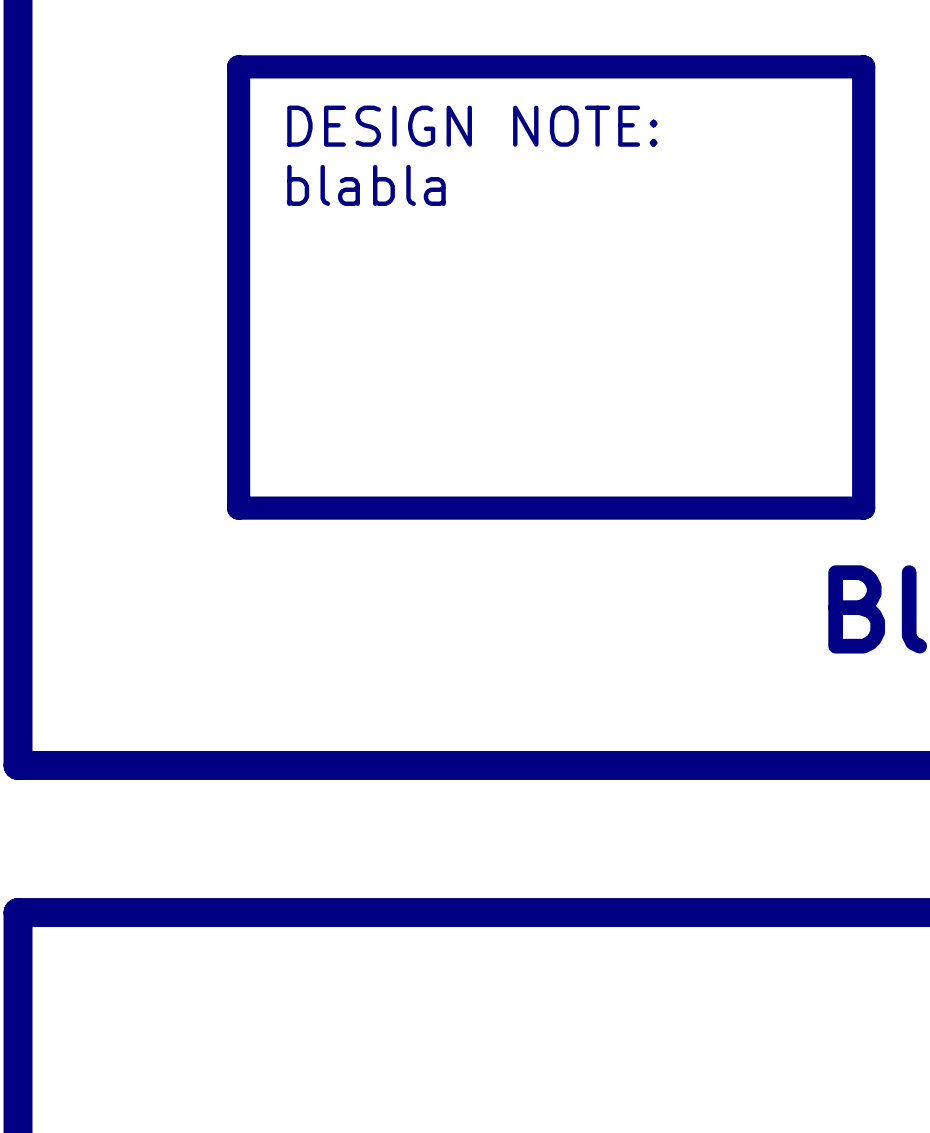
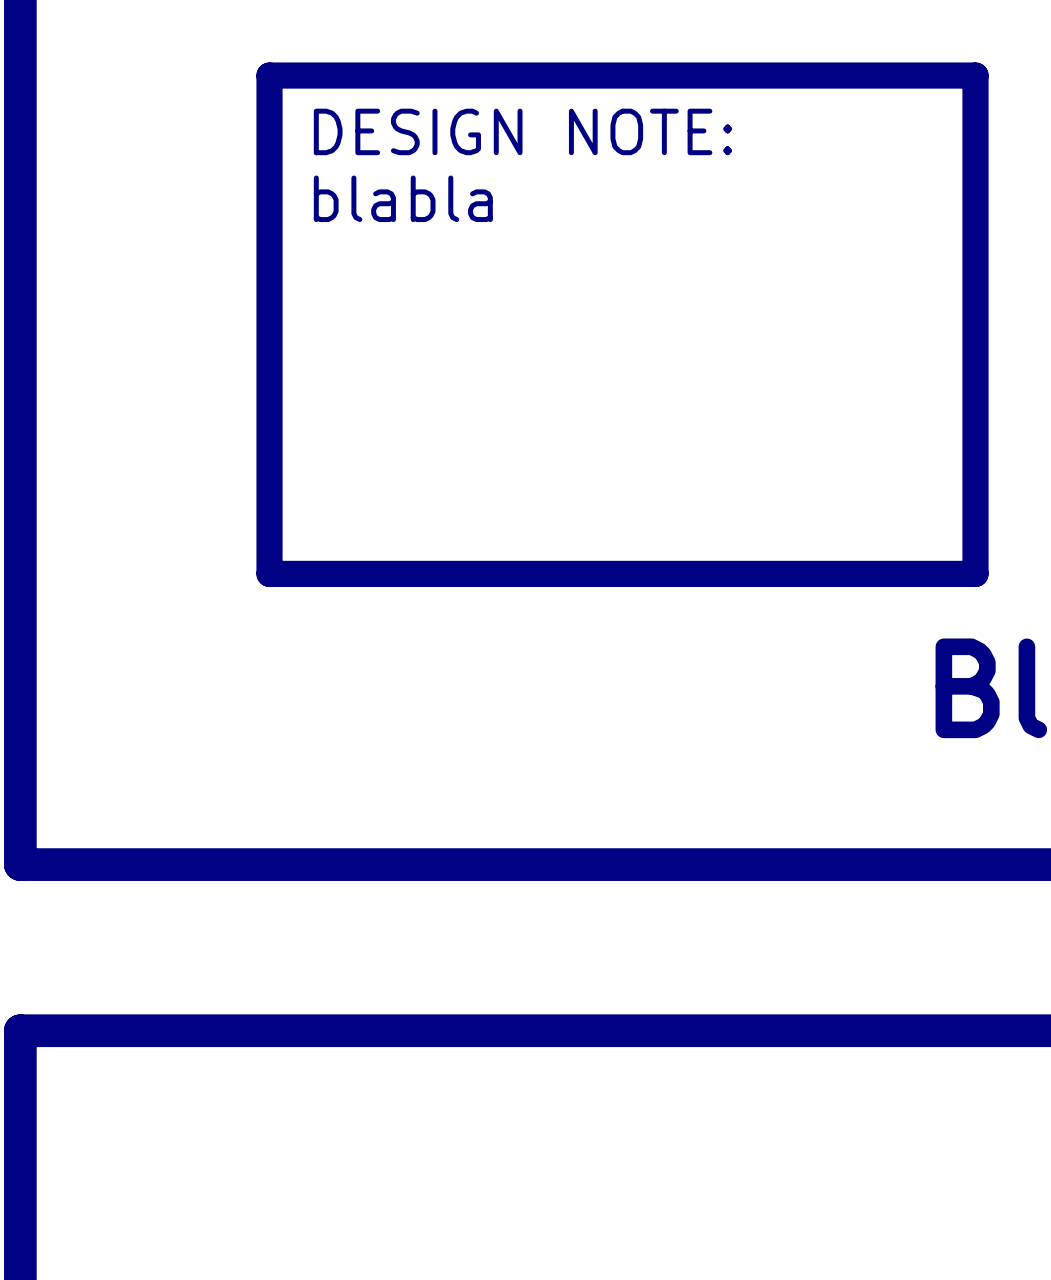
text position: DESIGN NOTE: (472, 126) -> DESIGN NOTE: (522, 131)
text position: blabla (366, 185) -> blabla (403, 198)

